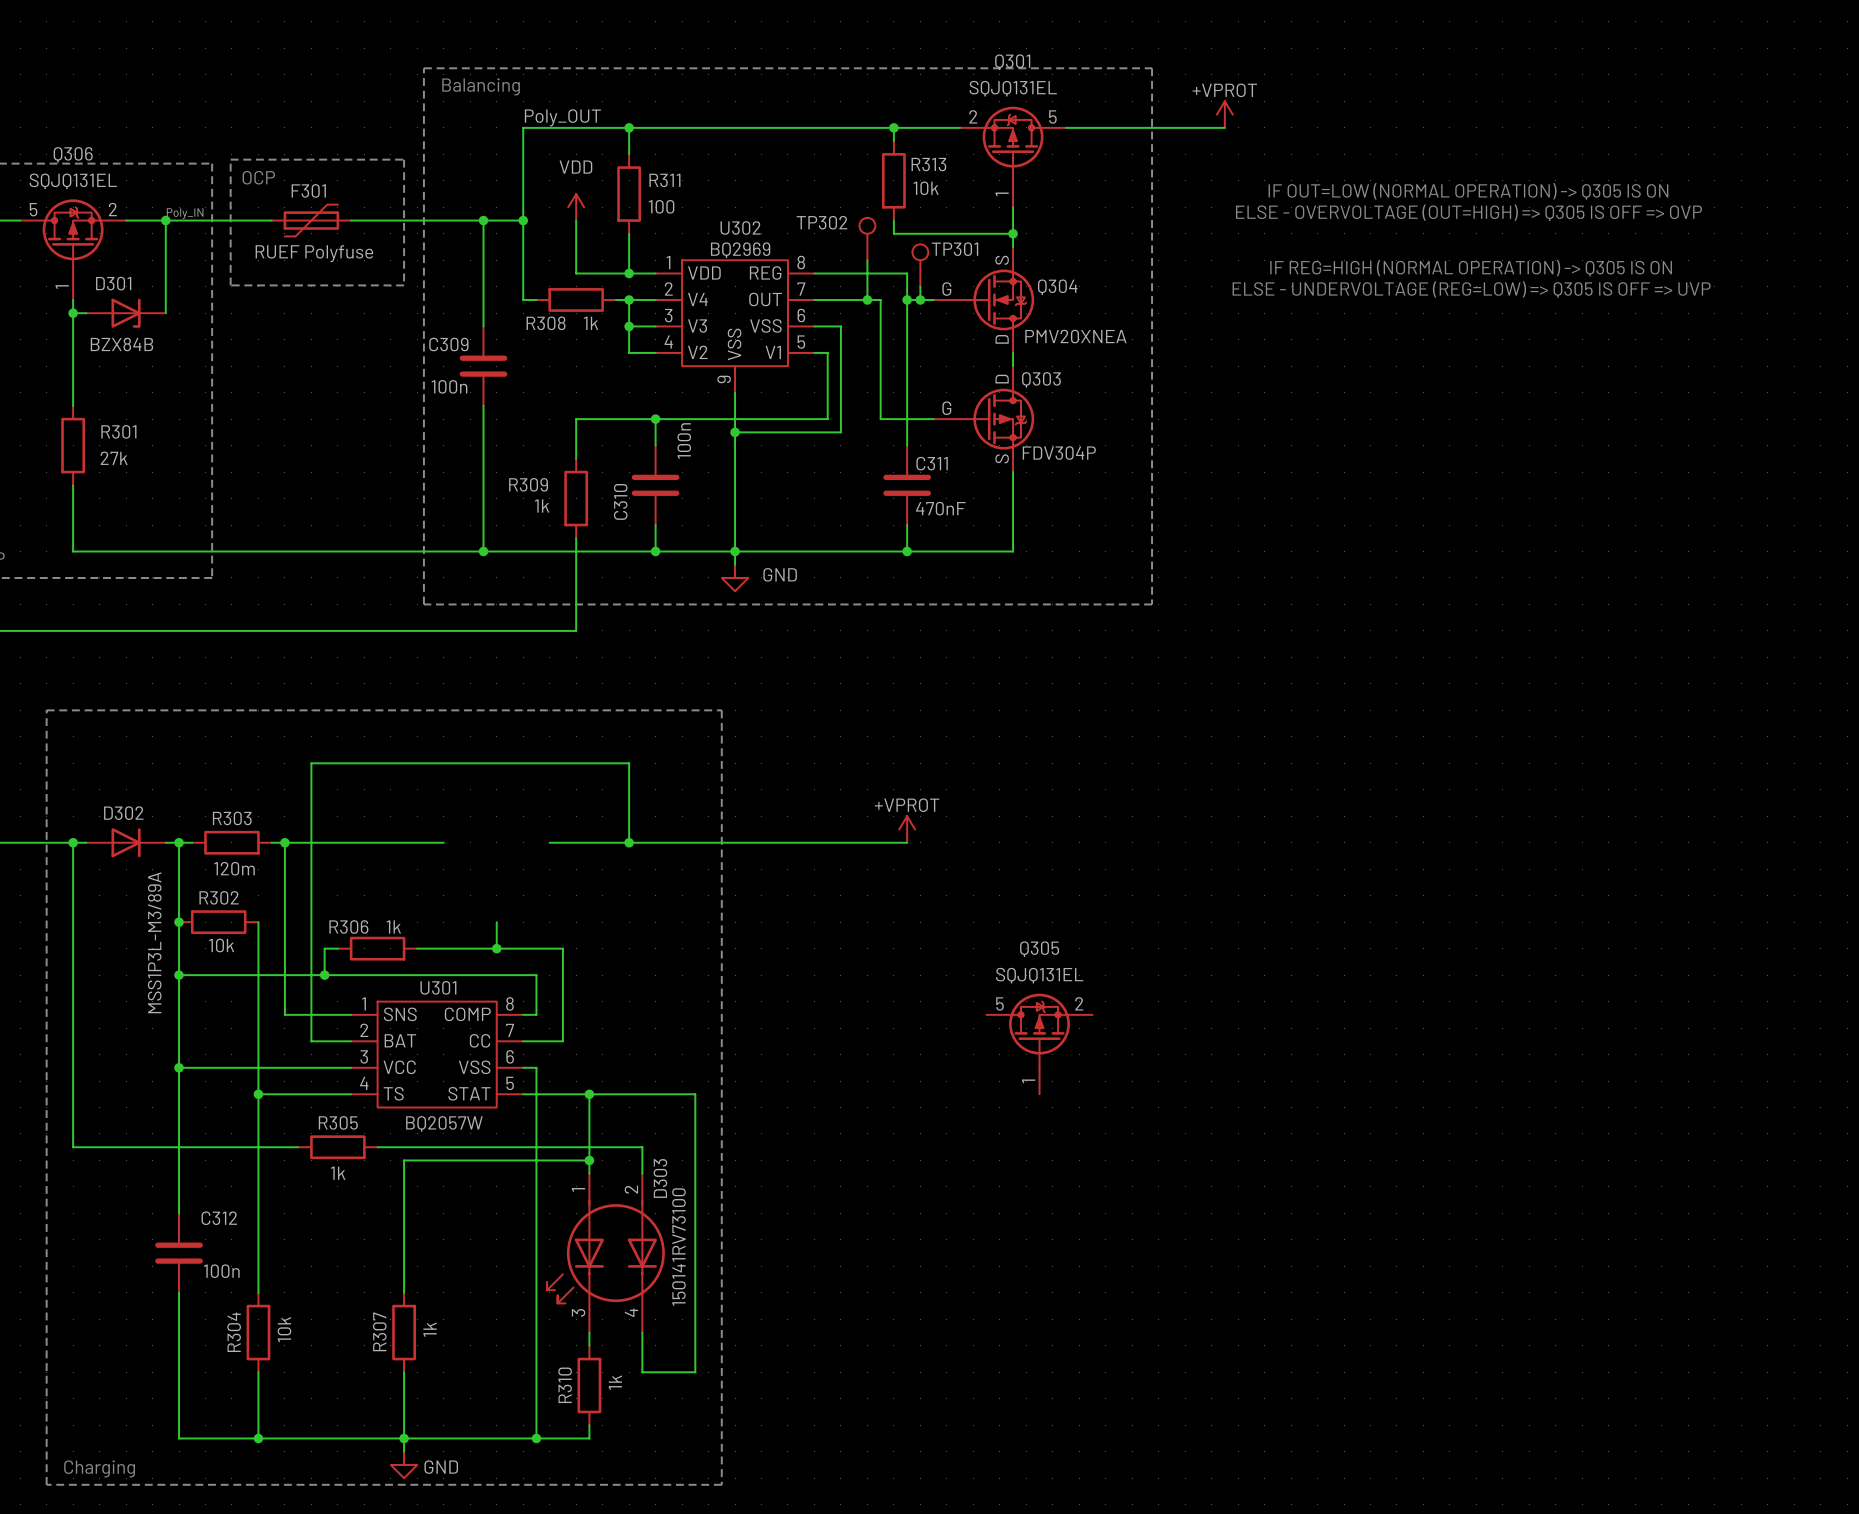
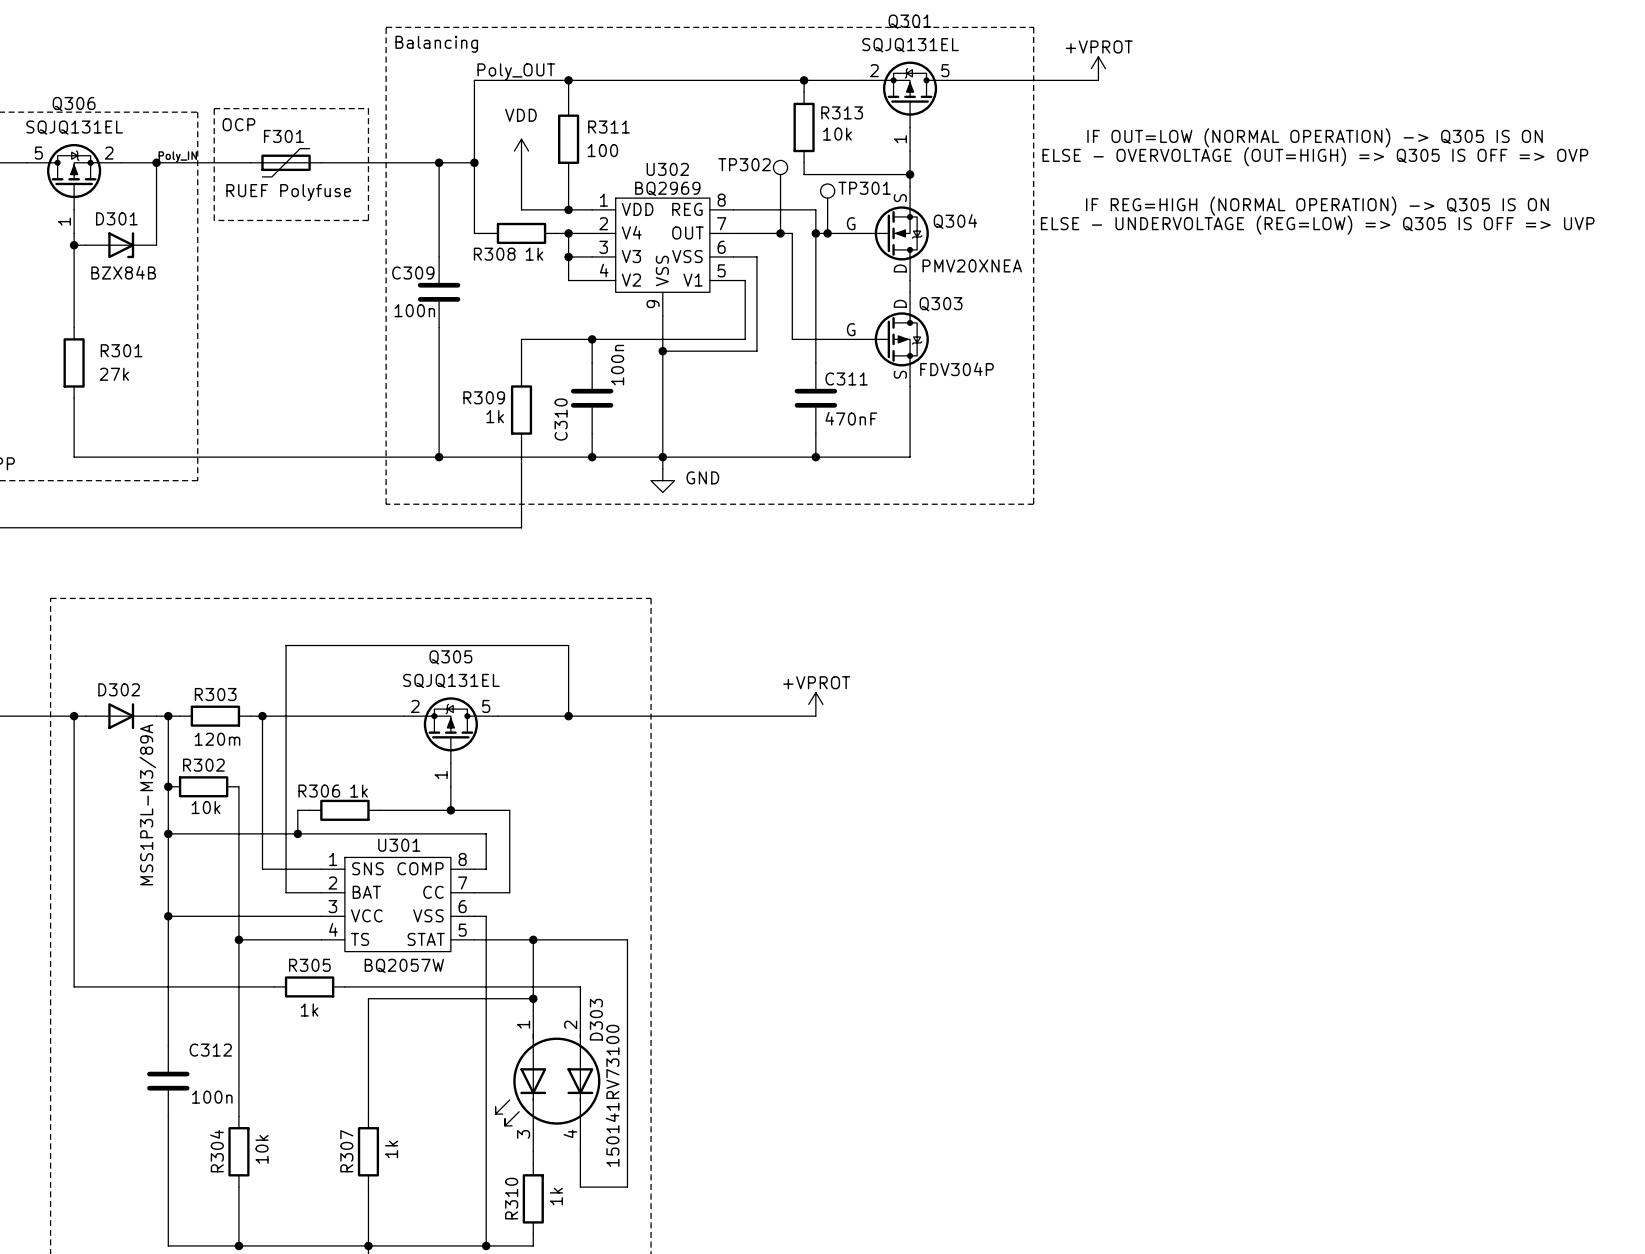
Q305 flip: as is (1039, 1030) -> left-right (450, 730)
Q305 position: (1039, 1043) -> (450, 742)

